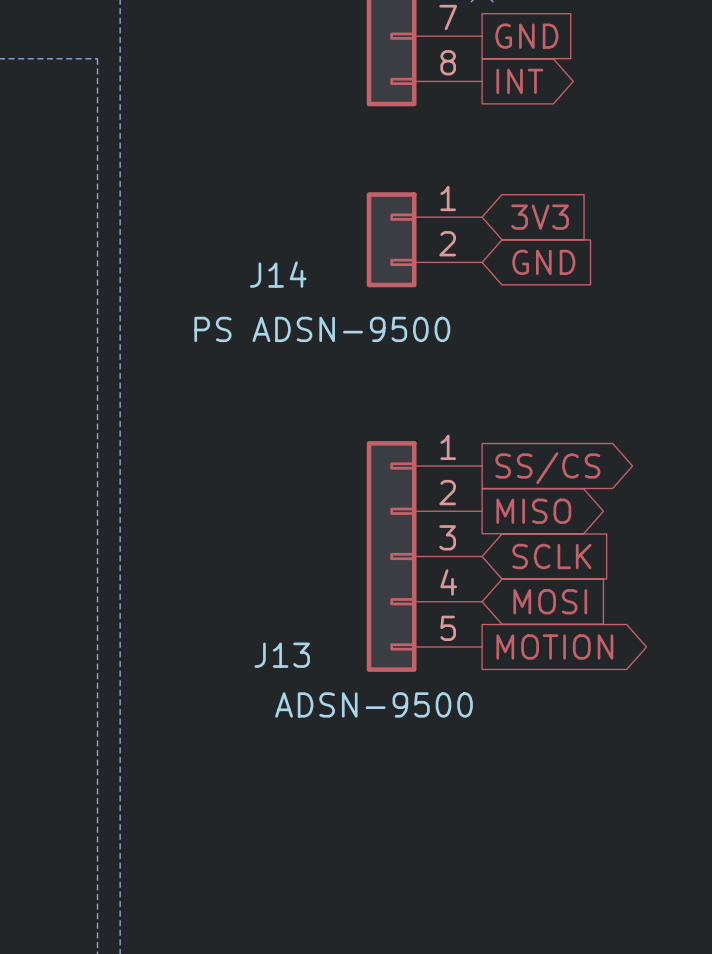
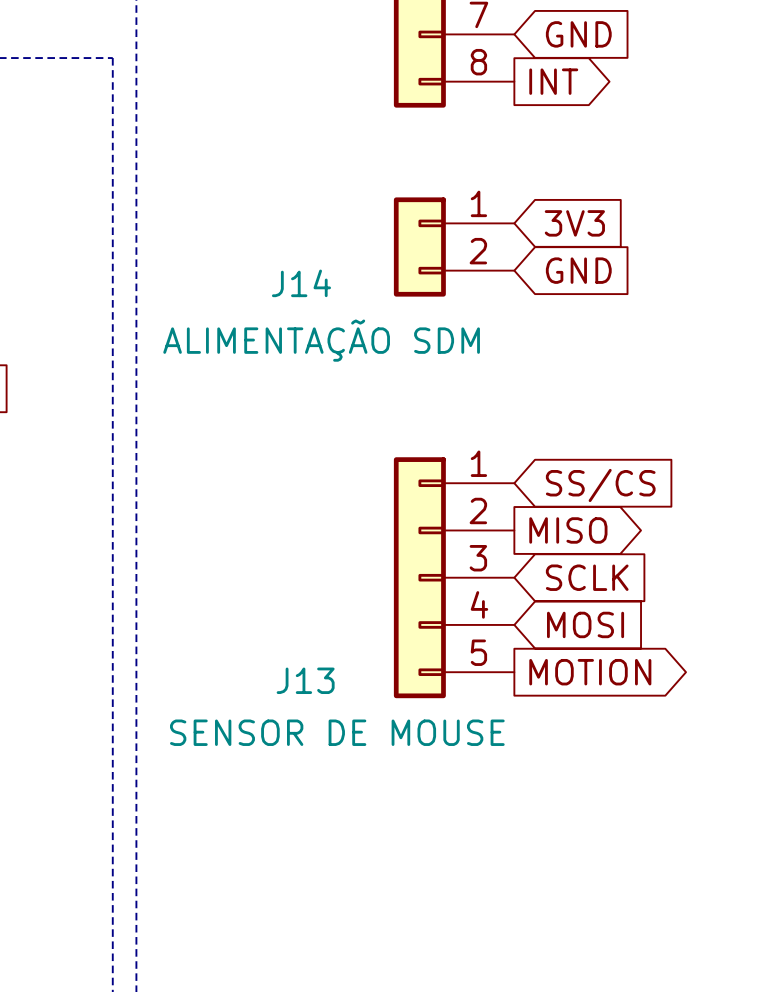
global label shape: passive (526, 36) -> input (578, 34)
J14 value: PS ADSN-9500 (322, 329) -> ALIMENTAÇÃO SDM (321, 340)
global label shape: output (547, 468) -> input (600, 485)
J13 value: ADSN-9500 (374, 704) -> SENSOR DE MOUSE (337, 732)

